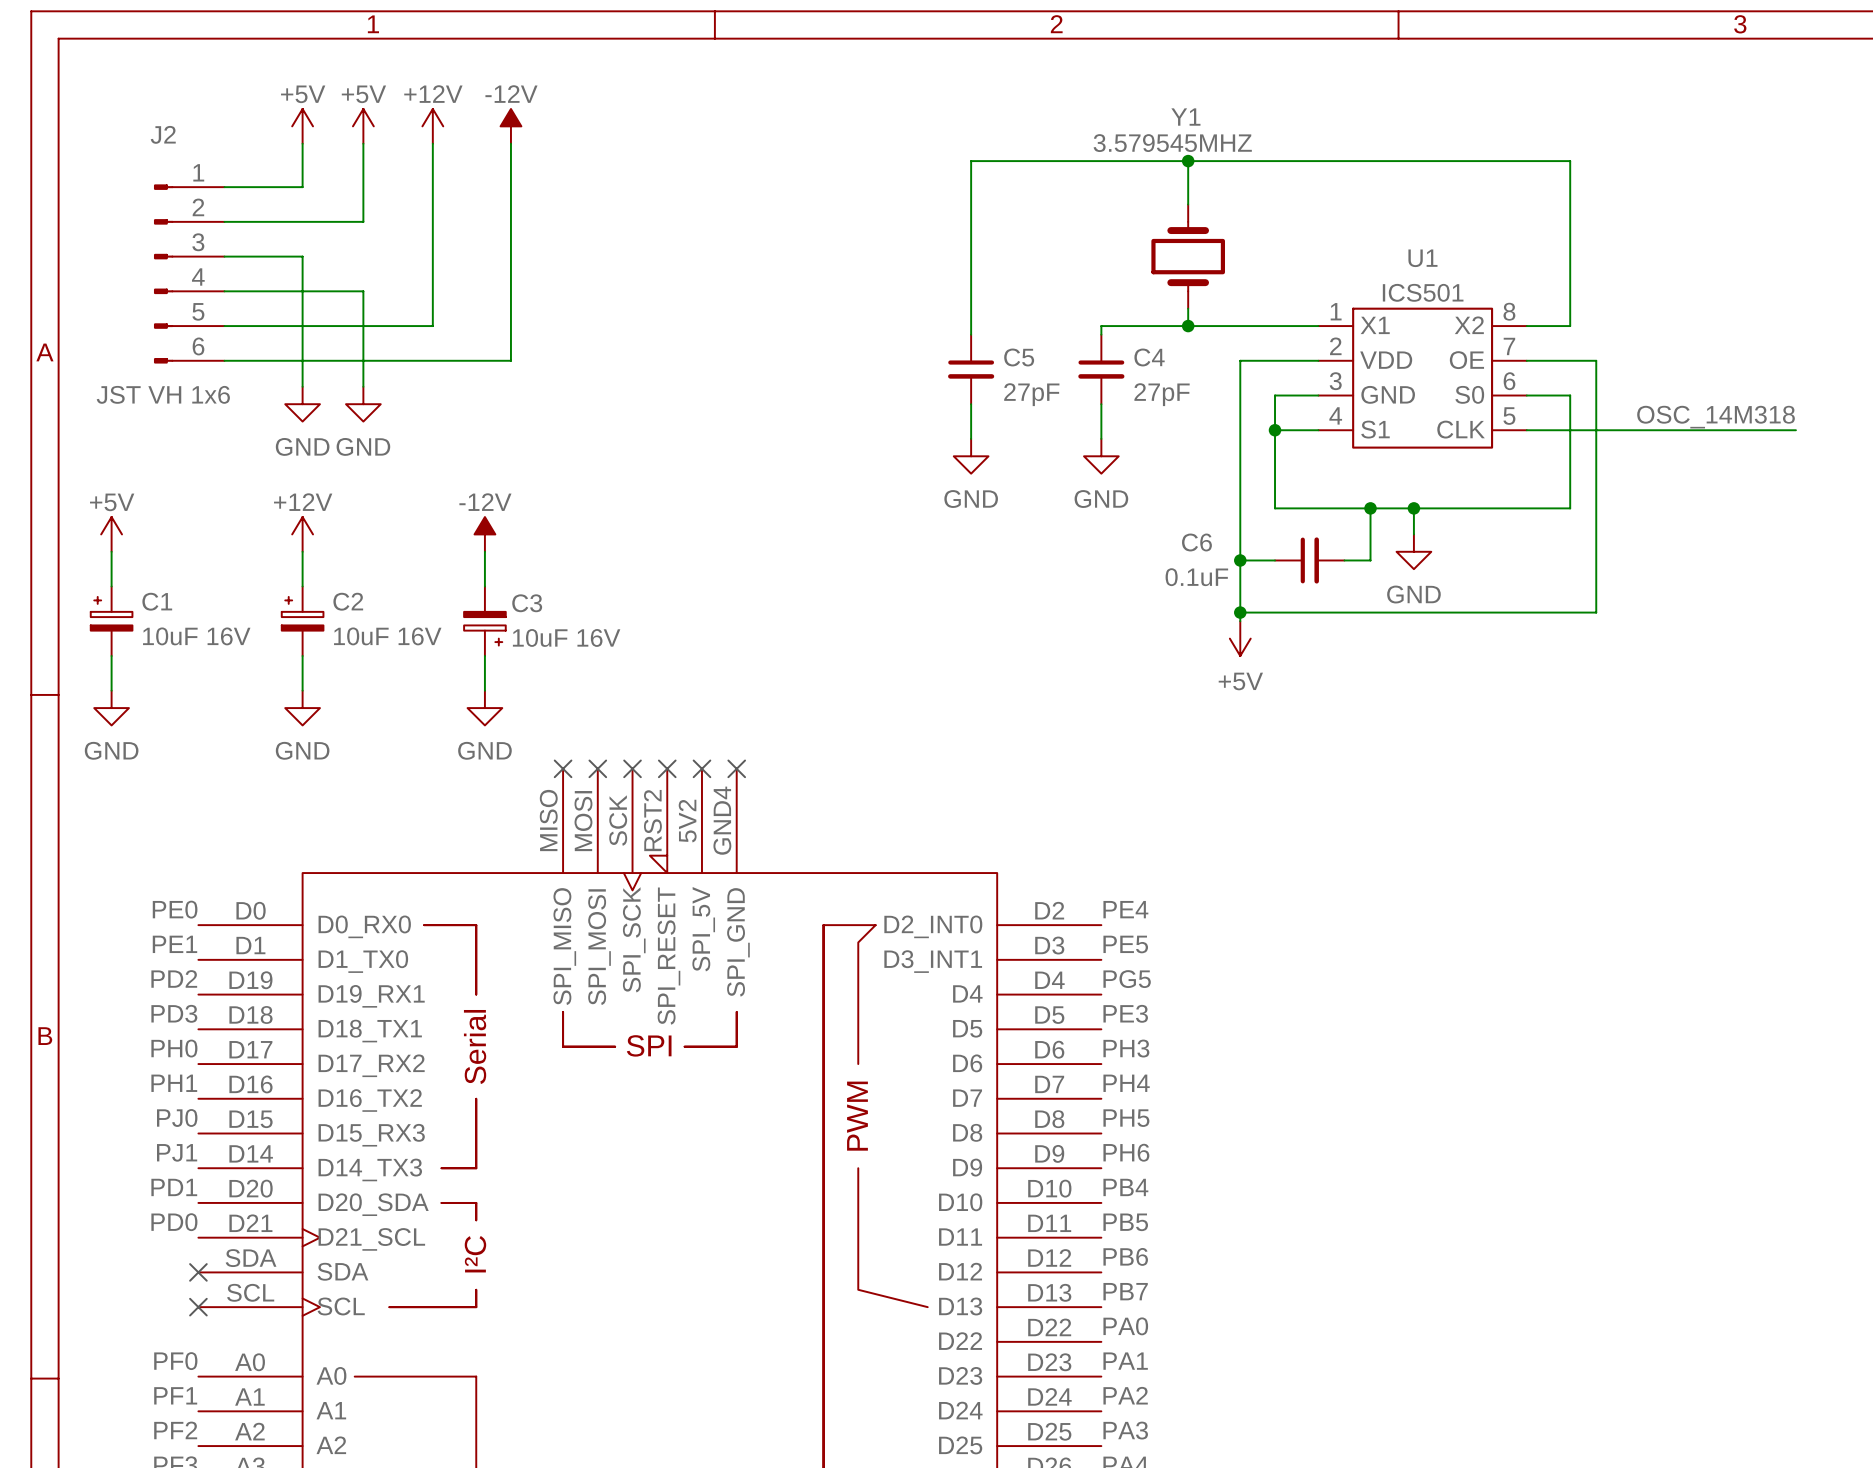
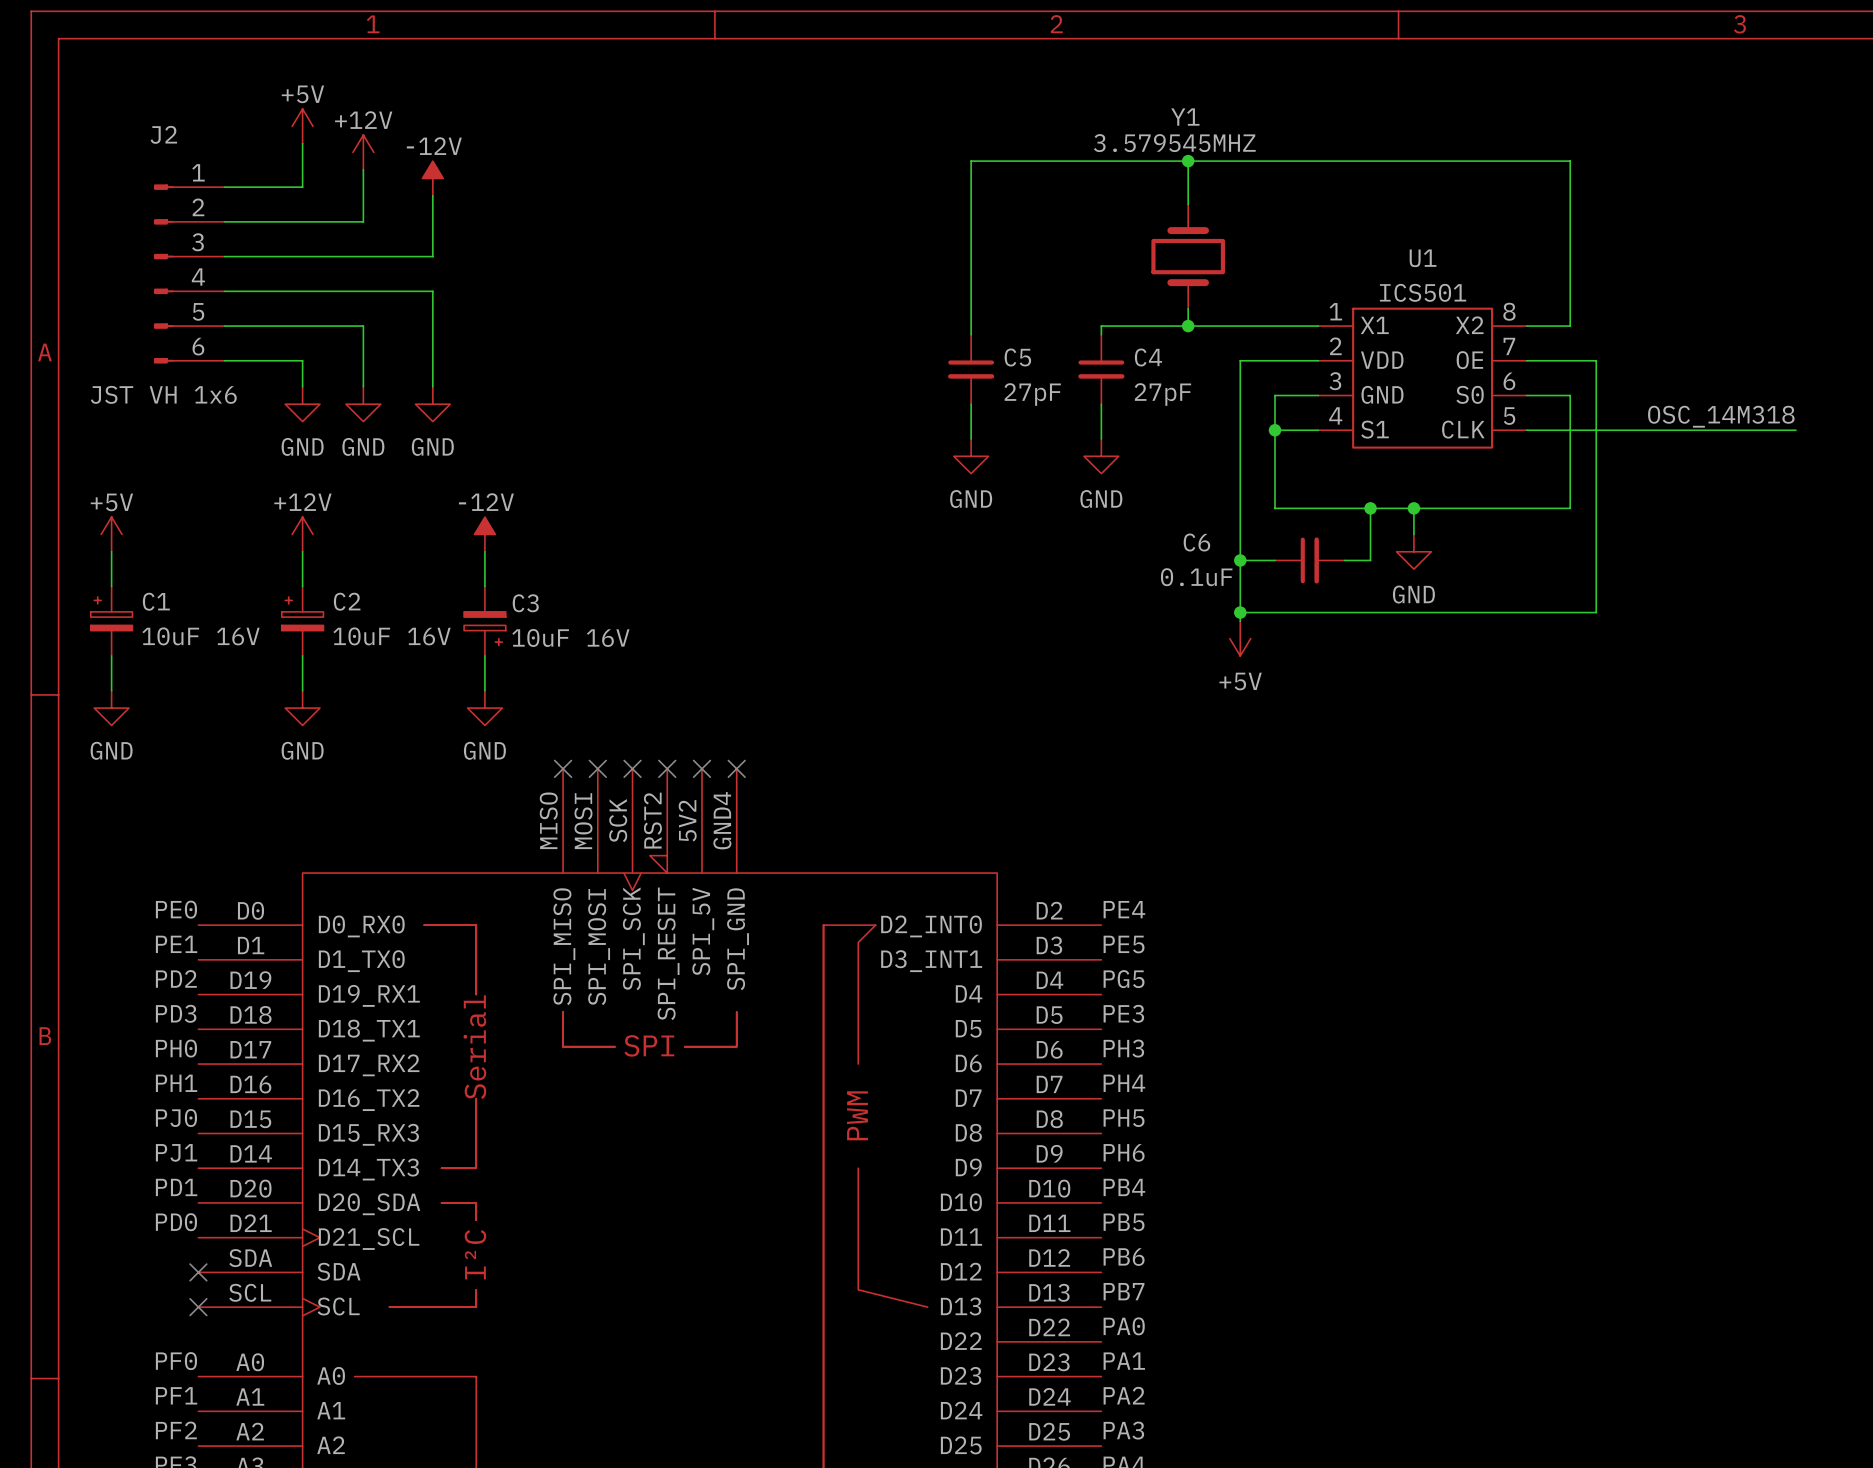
power symbol: +5V (363, 126) -> none
power symbol position: +12V (432, 126) -> +12V (363, 152)
power symbol position: -12V (510, 126) -> -12V (432, 178)
wire: (510, 143) (510, 360) (302, 360) (302, 256) -> none
wire: (432, 256) (432, 291) -> (432, 256) (302, 256)
wire: (363, 291) (363, 326) (432, 326) -> (363, 291) (432, 291)
wire: none -> (432, 326) (432, 386)
power symbol: none -> GND (432, 404)

